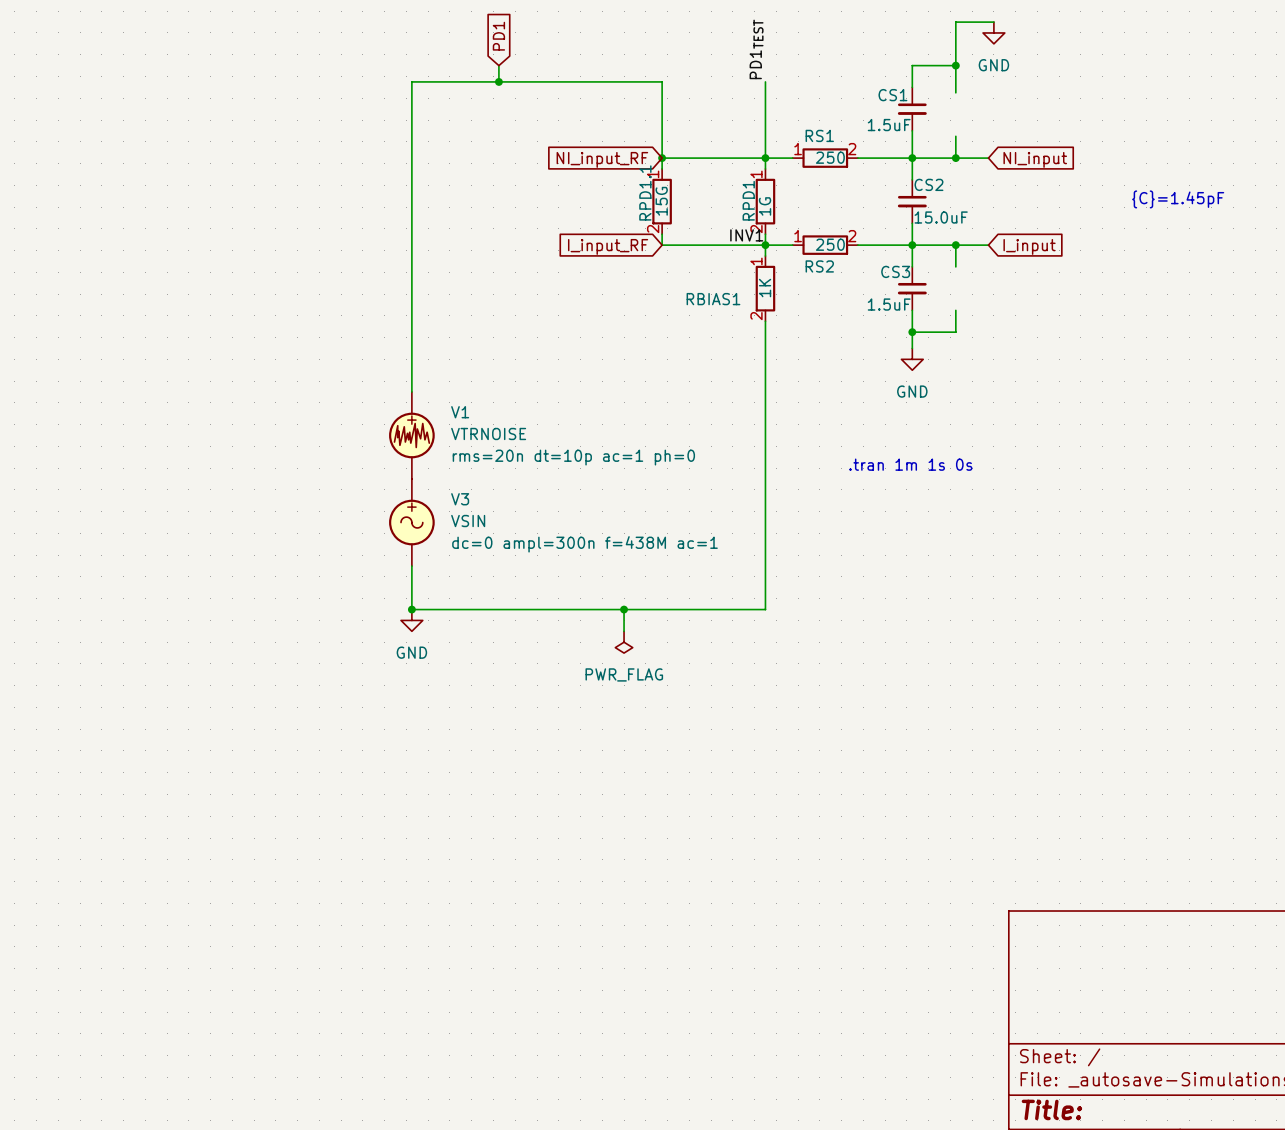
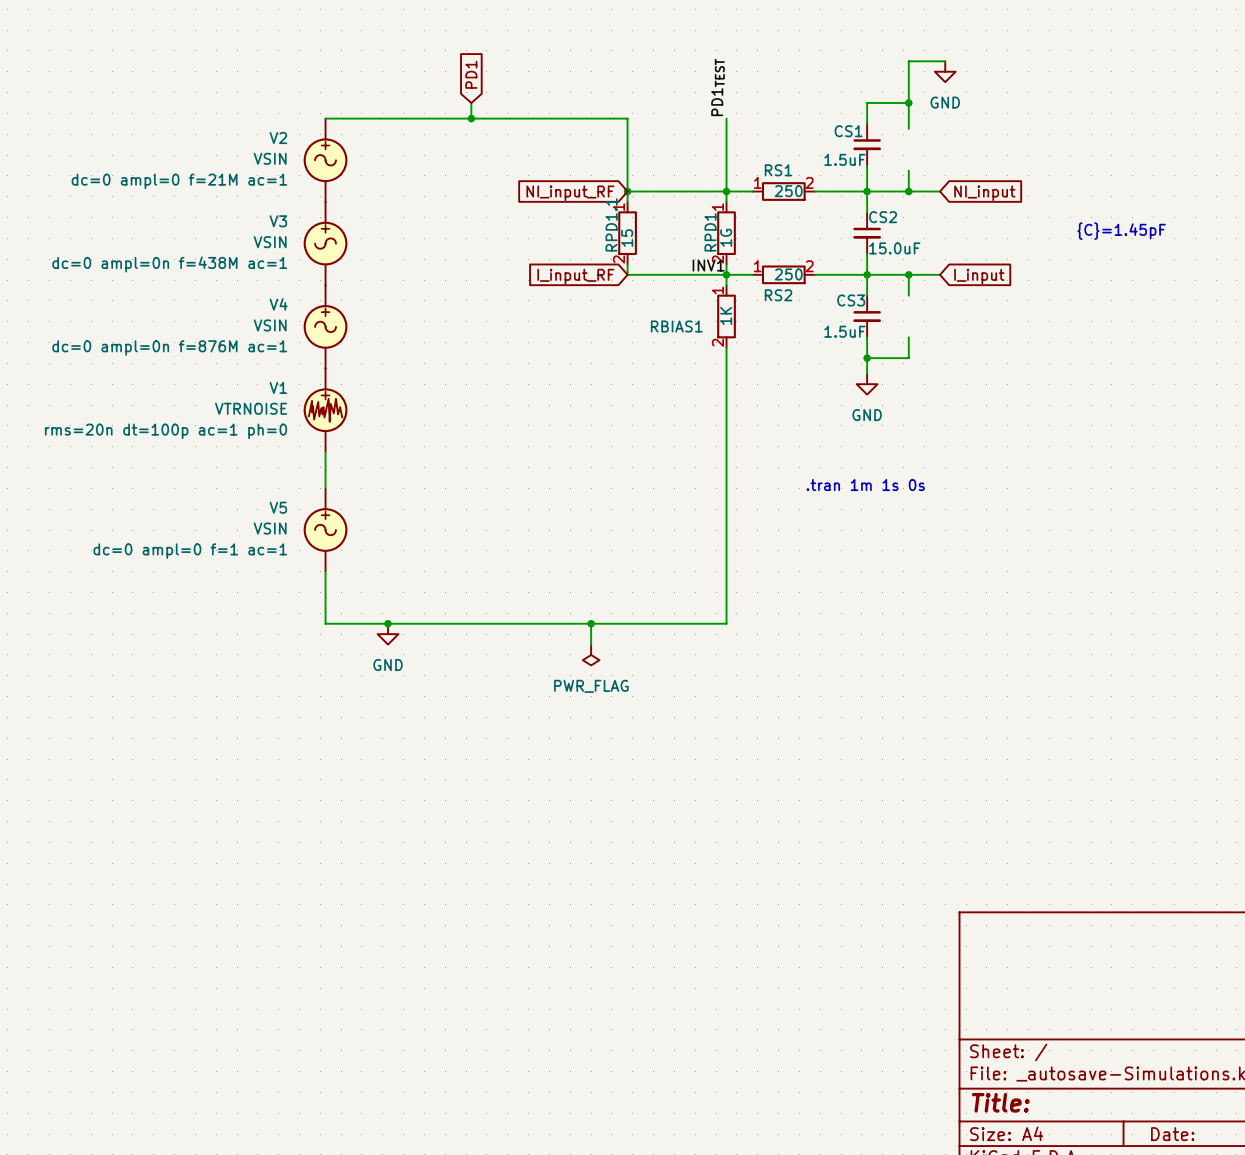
wire: (411, 81) (411, 391) -> (388, 118) (325, 118)
V2: none -> VSIN (325, 160)
RPD1.1 value: 15G (661, 201) -> 15 (627, 238)
V4: none -> VSIN (325, 326)
V1 name position: V1 (460, 412) -> V1 (278, 387)
wire: none -> (325, 451) (325, 488)
V1 value position: VTRNOISE (488, 433) -> VTRNOISE (251, 408)
V1 position: (411, 435) -> (325, 410)
V1 text: rms=20n dt=10p ac=1 ph=0 (573, 457) -> rms=20n dt=100p ac=1 ph=0 (166, 431)
V5: none -> VSIN (325, 530)
V3 flip: as is (411, 522) -> left-right (325, 243)
V3 position: (411, 522) -> (325, 243)
V3 text: dc=0 ampl=300n f=438M ac=1 (585, 544) -> dc=0 ampl=0n f=438M ac=1 (169, 264)
wire: (411, 566) (411, 609) -> (325, 571) (325, 623) (388, 623)

